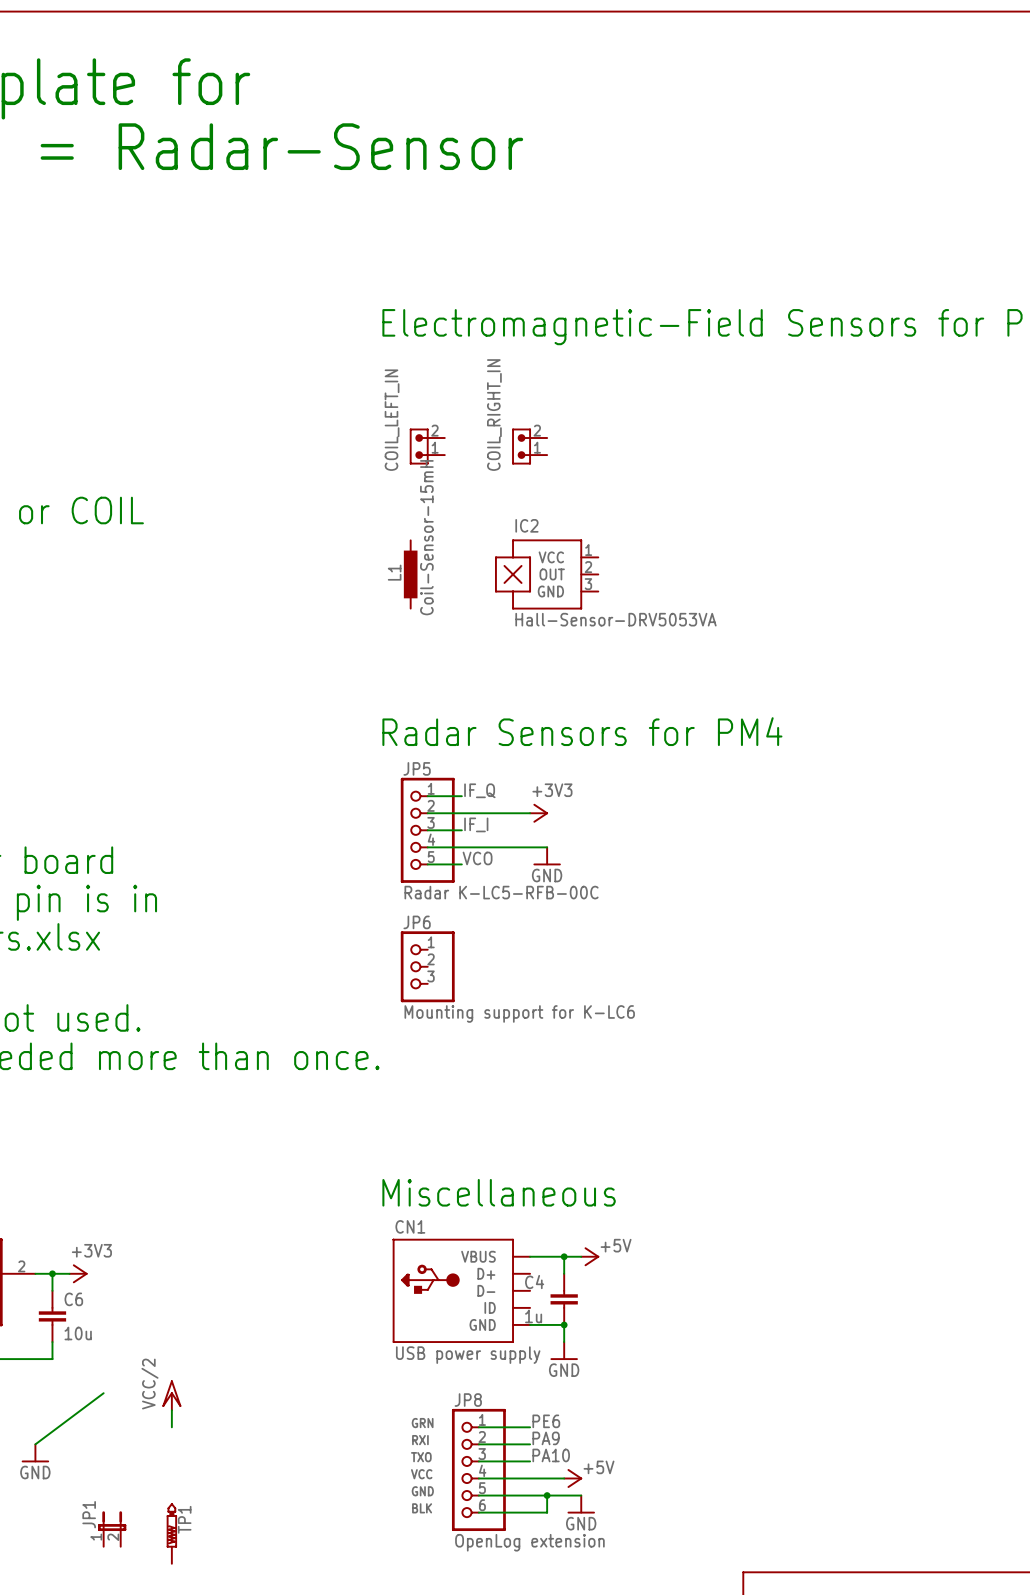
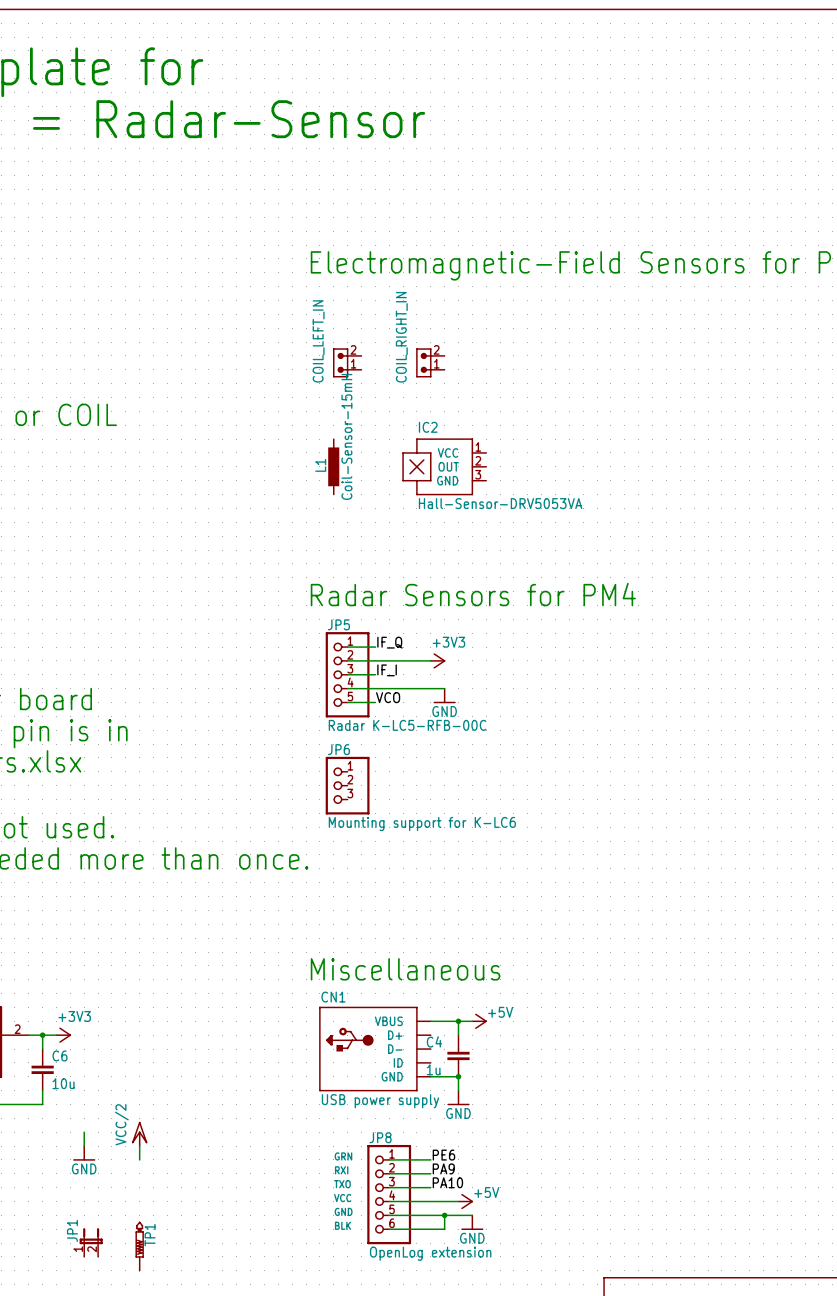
wire: (103, 1393) (35, 1444) -> (84, 1132) (84, 1146)
power symbol position: GND (35, 1453) -> GND (84, 1153)

